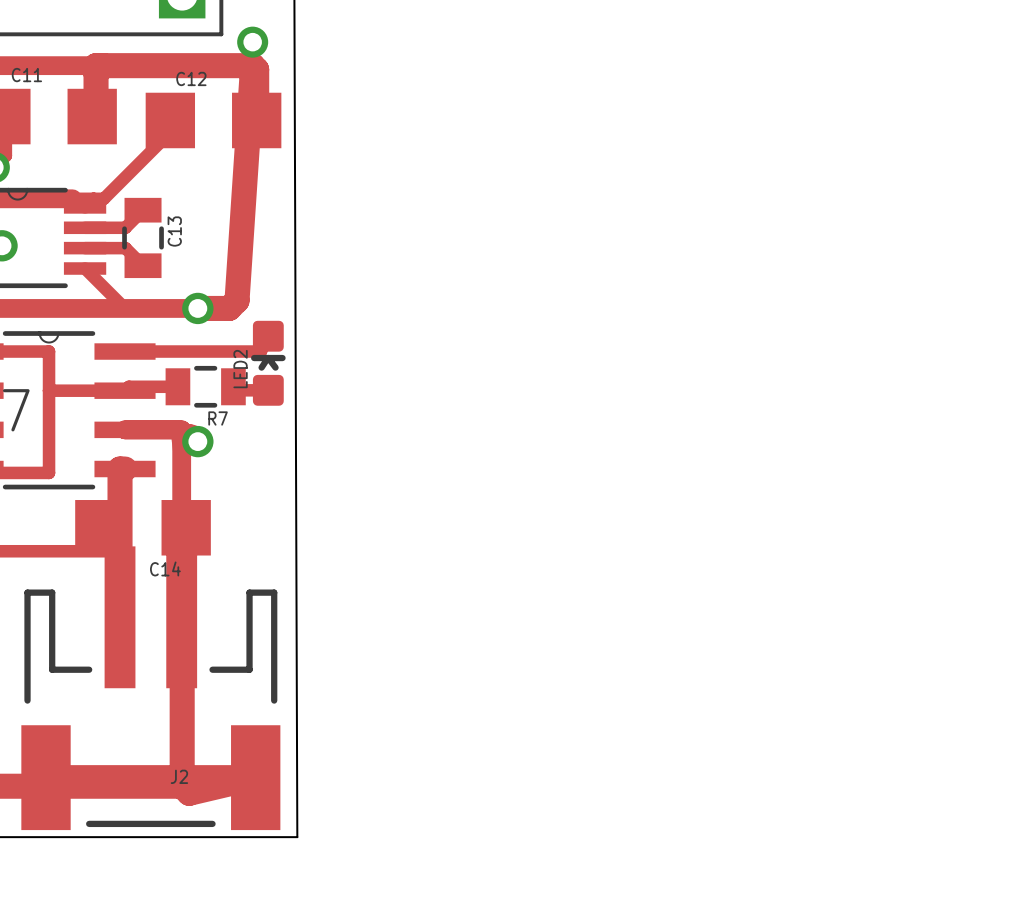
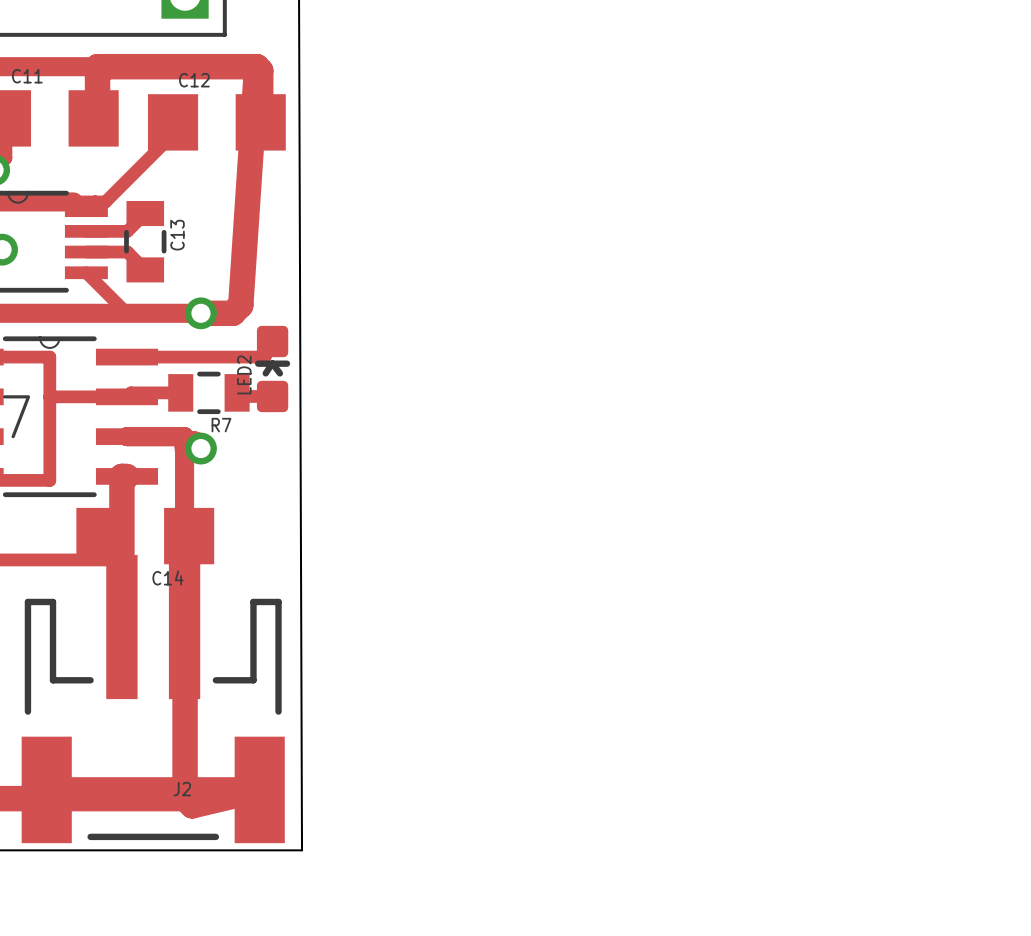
via: (252, 42) -> none

